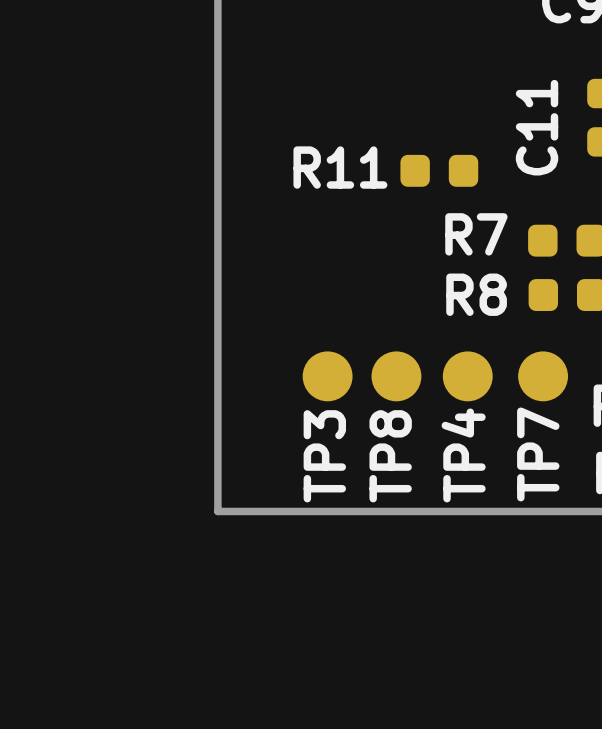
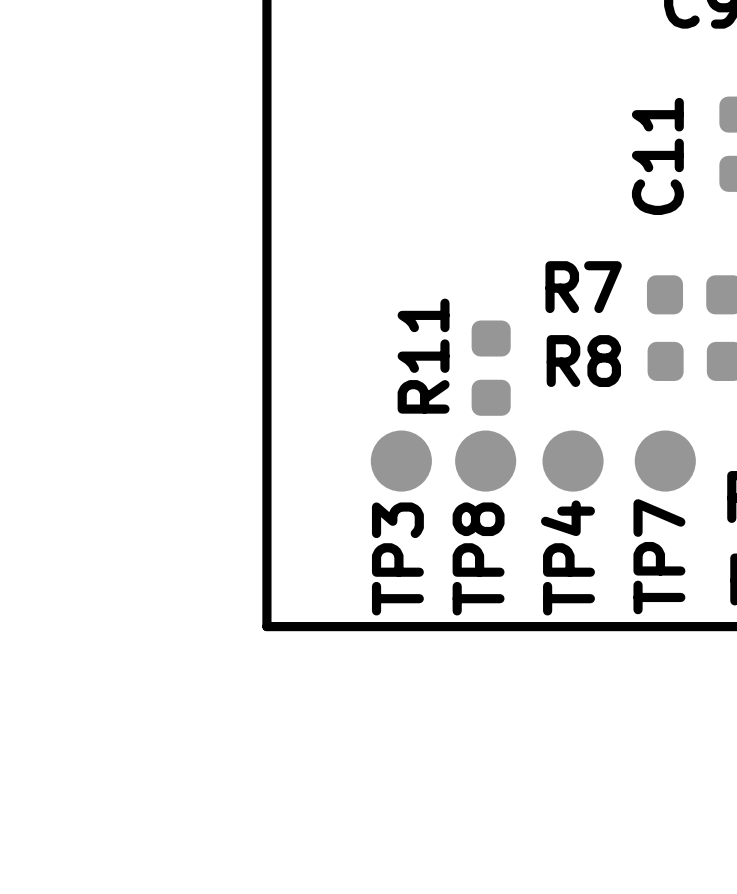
R11 rotation: 0° (439, 170) -> 90° clockwise (491, 368)
R11 position: (439, 170) -> (491, 368)

